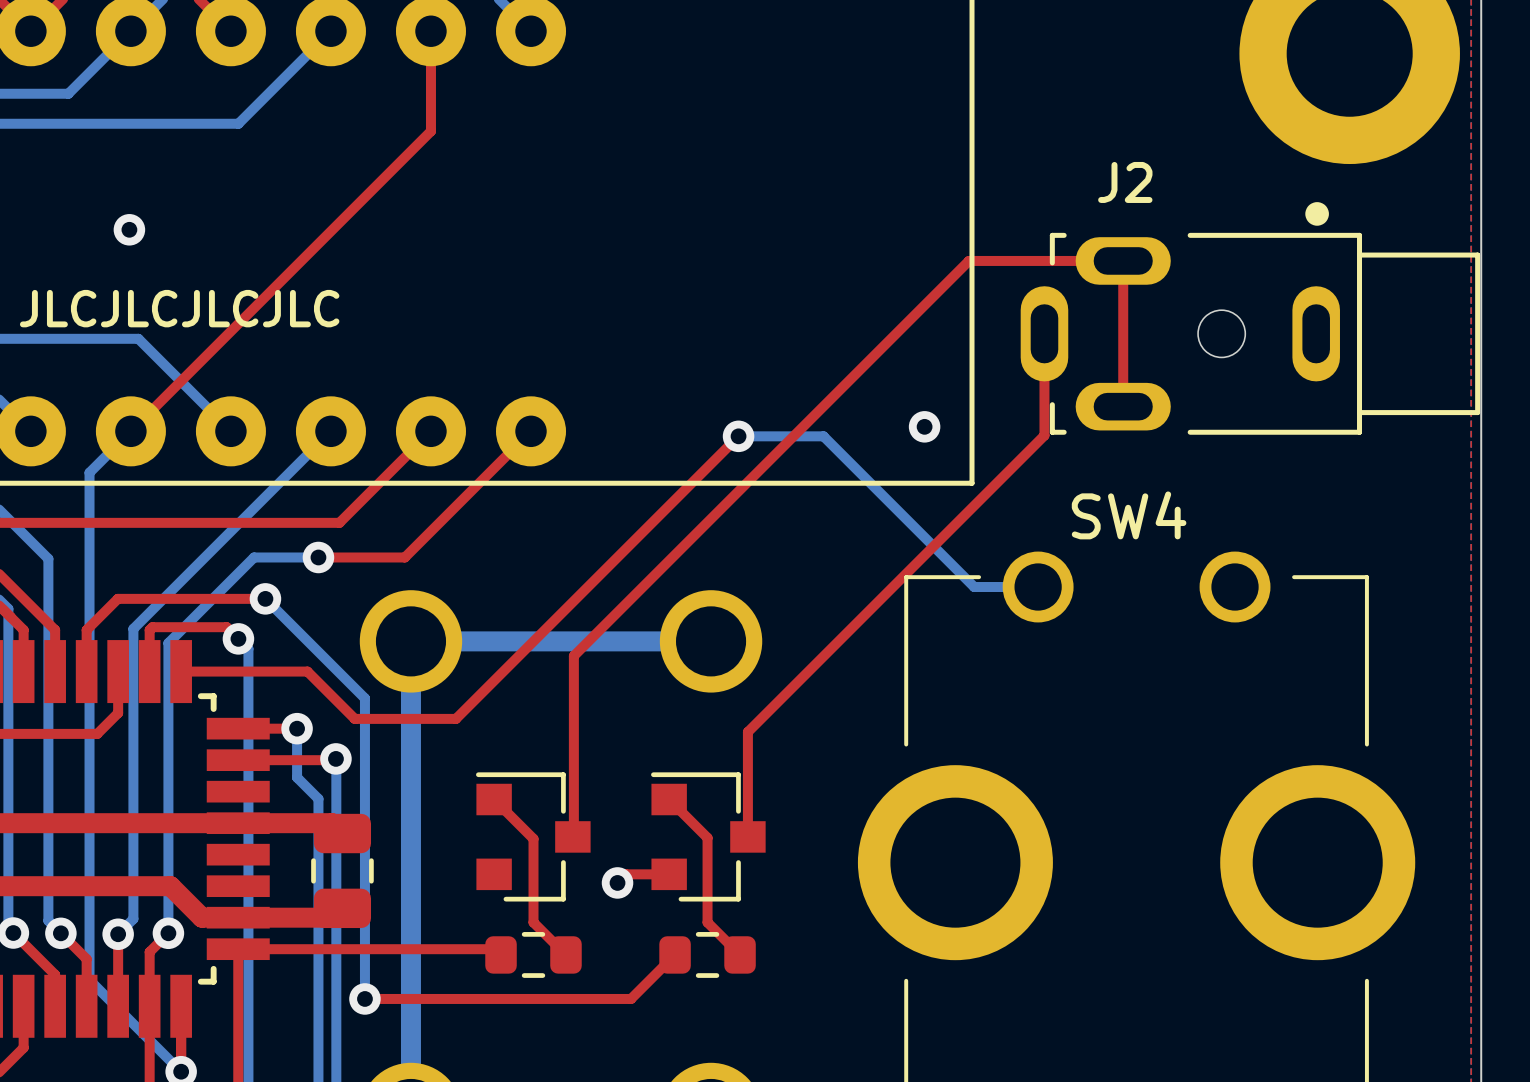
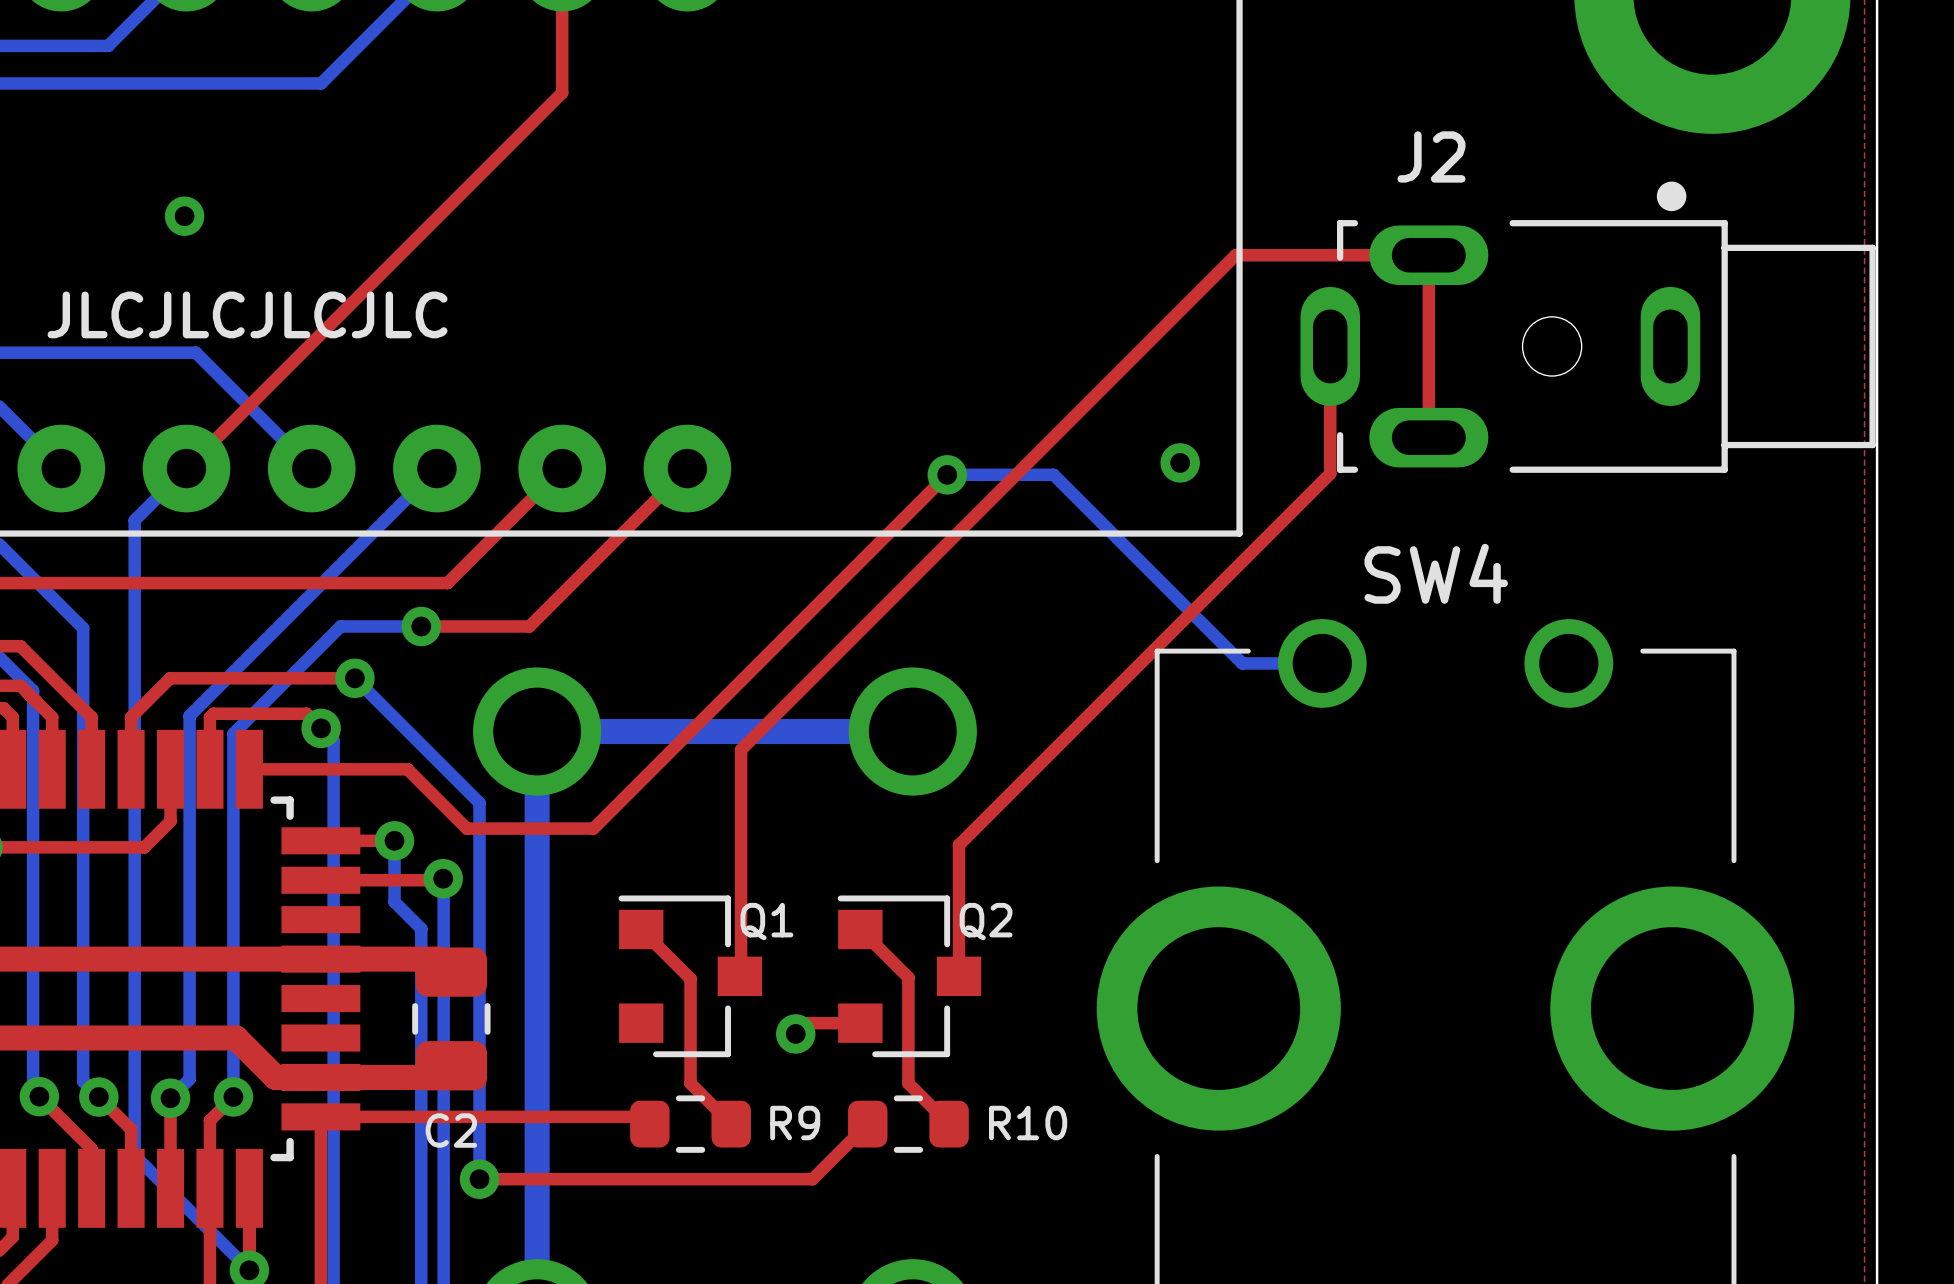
Q1 name: none -> Q1 (766, 921)
Q2 name: none -> Q2 (986, 921)
R9 name: none -> R9 (795, 1123)
R10 name: none -> R10 (1028, 1123)
C2 name: none -> C2 (451, 1130)

